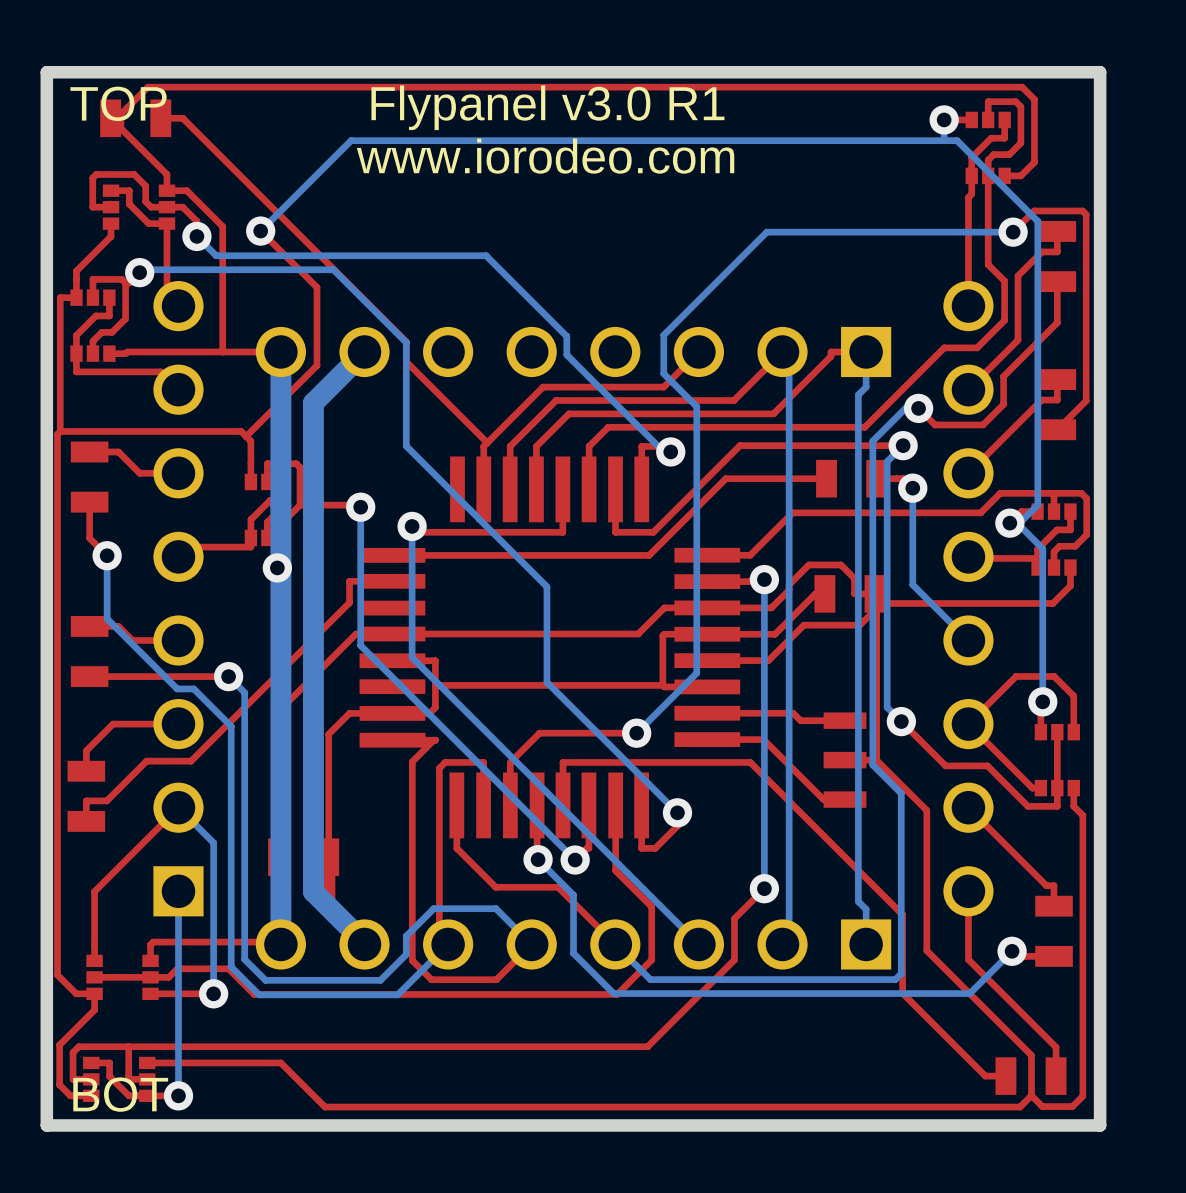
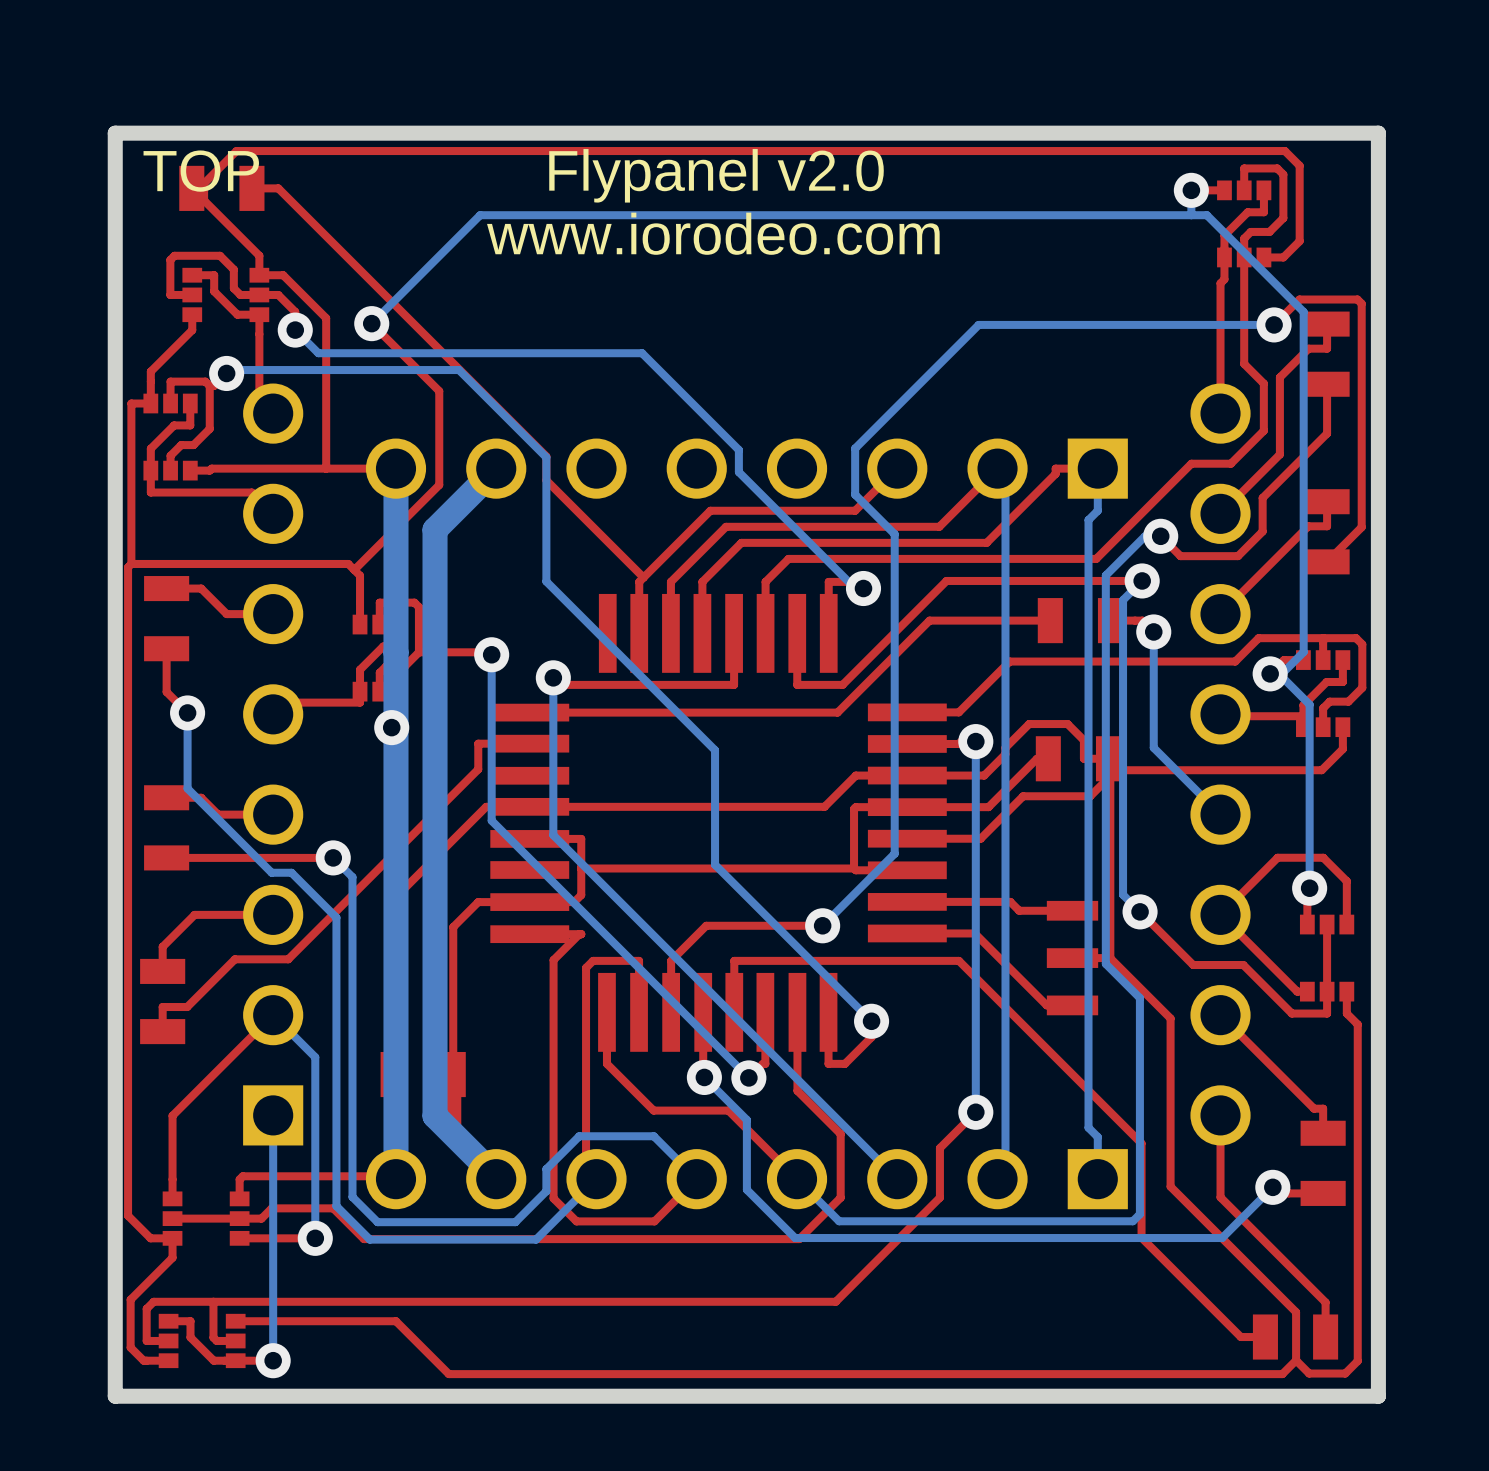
text: Flypanel v3.0 R1 (547, 107) -> Flypanel v2.0 (716, 175)
text: BOT (120, 1094) -> none

